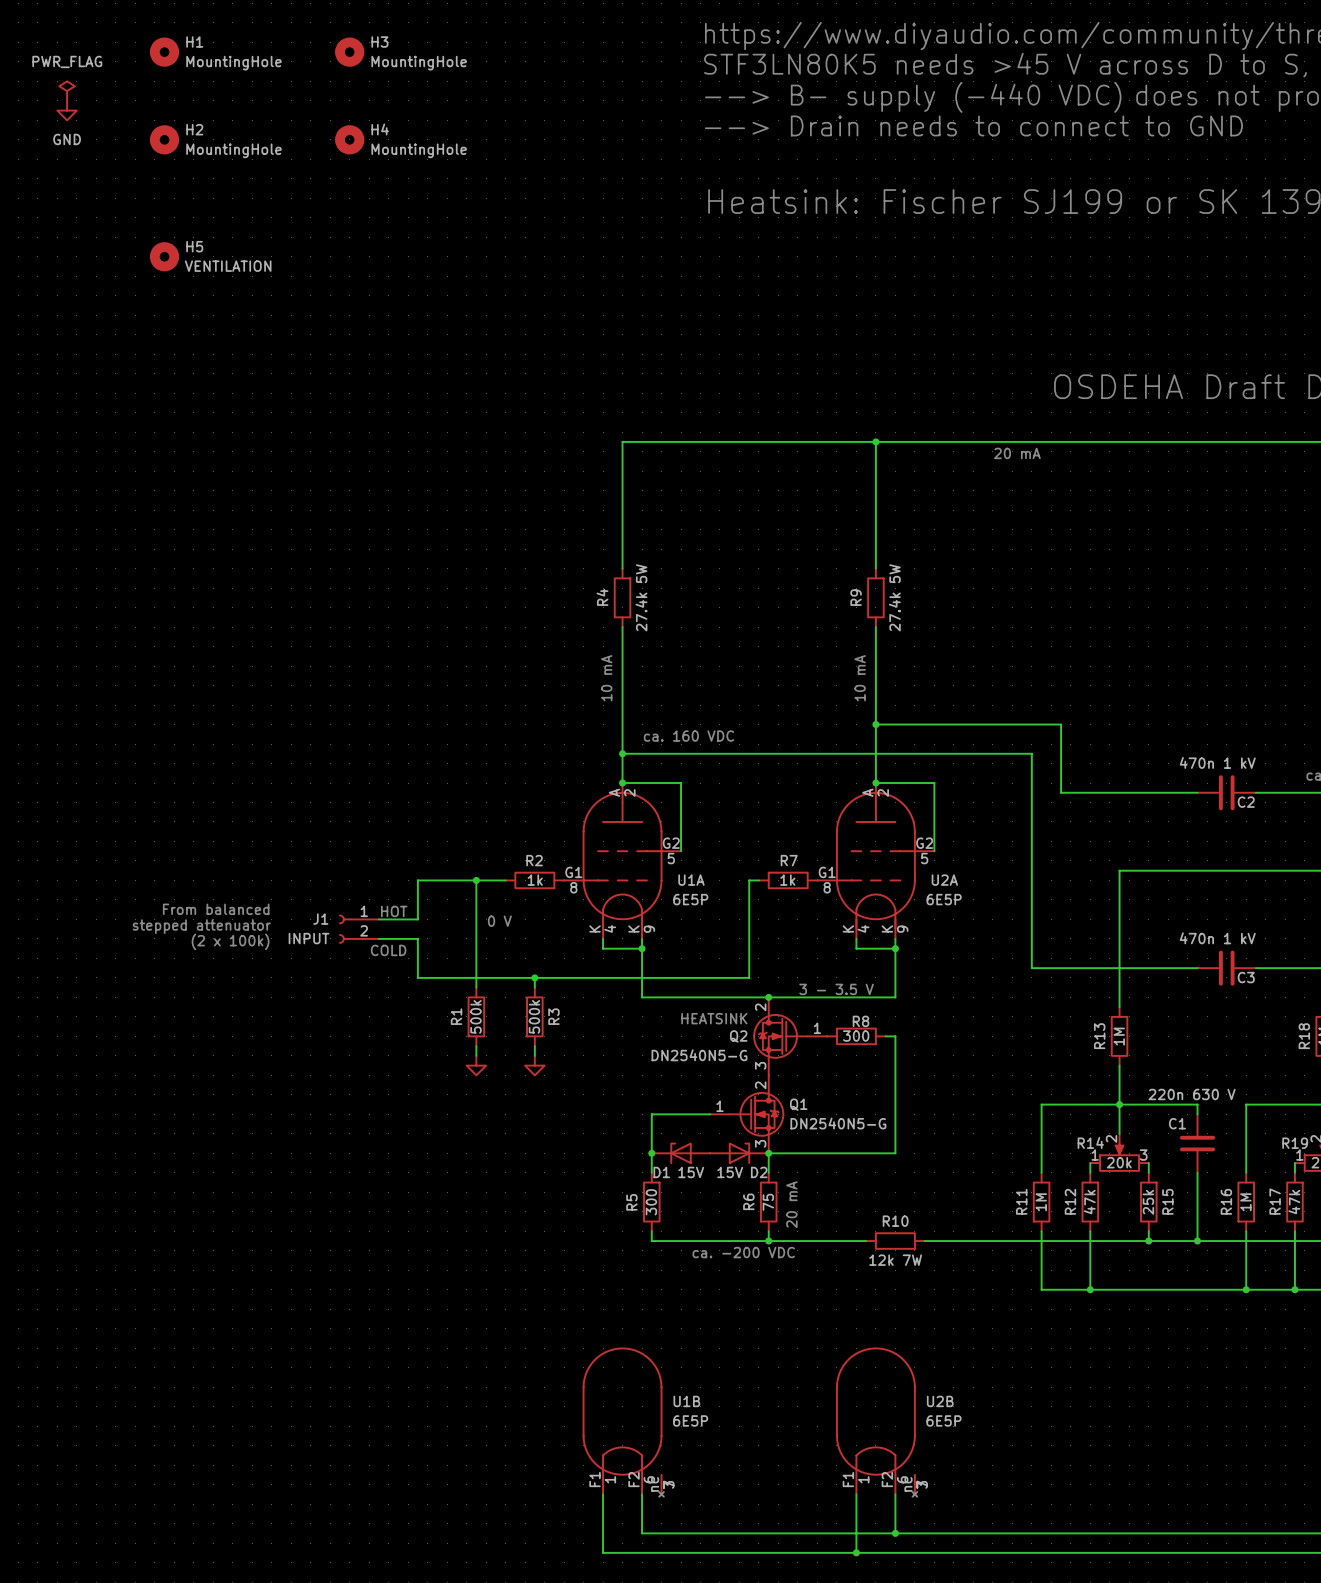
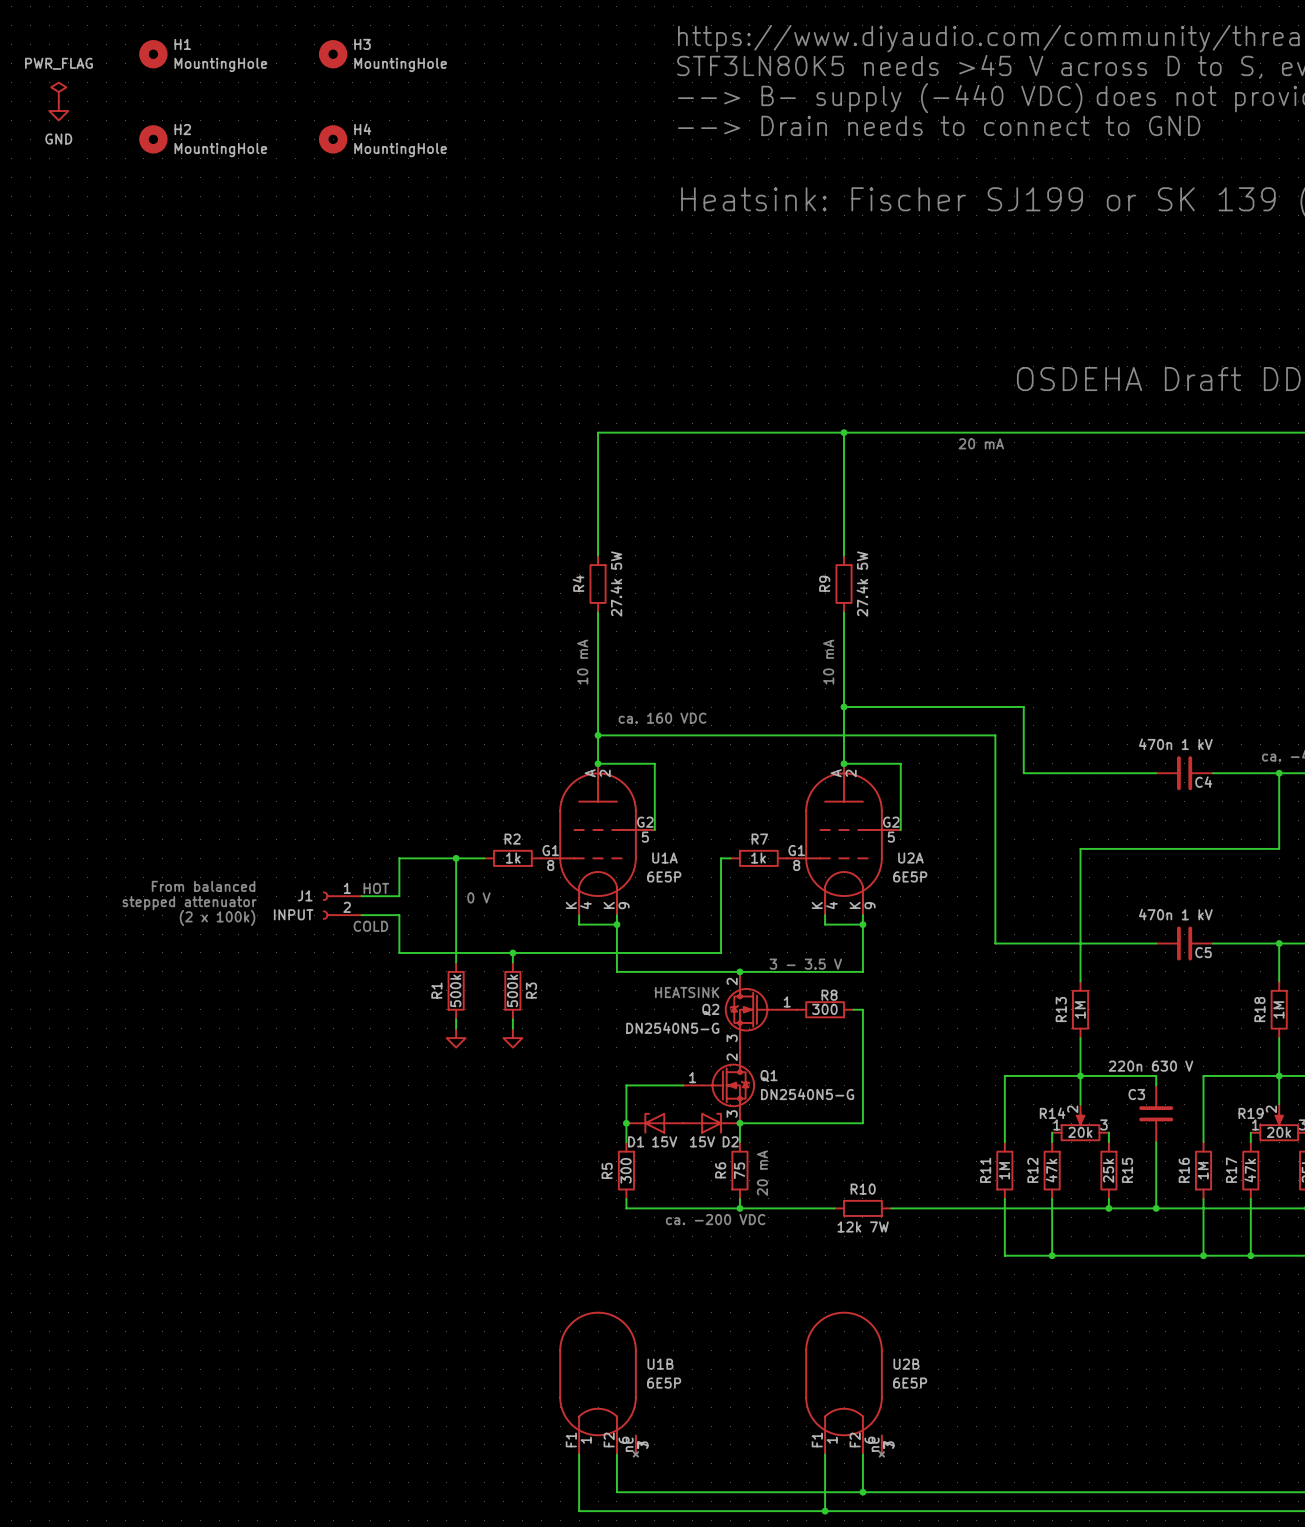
H5: VENTILATION (164, 256) -> none
C2 name: C2 (1246, 802) -> C4 (1203, 782)
C3 name: C3 (1246, 977) -> C5 (1203, 952)
C1 name: C1 (1177, 1123) -> C3 (1136, 1094)

